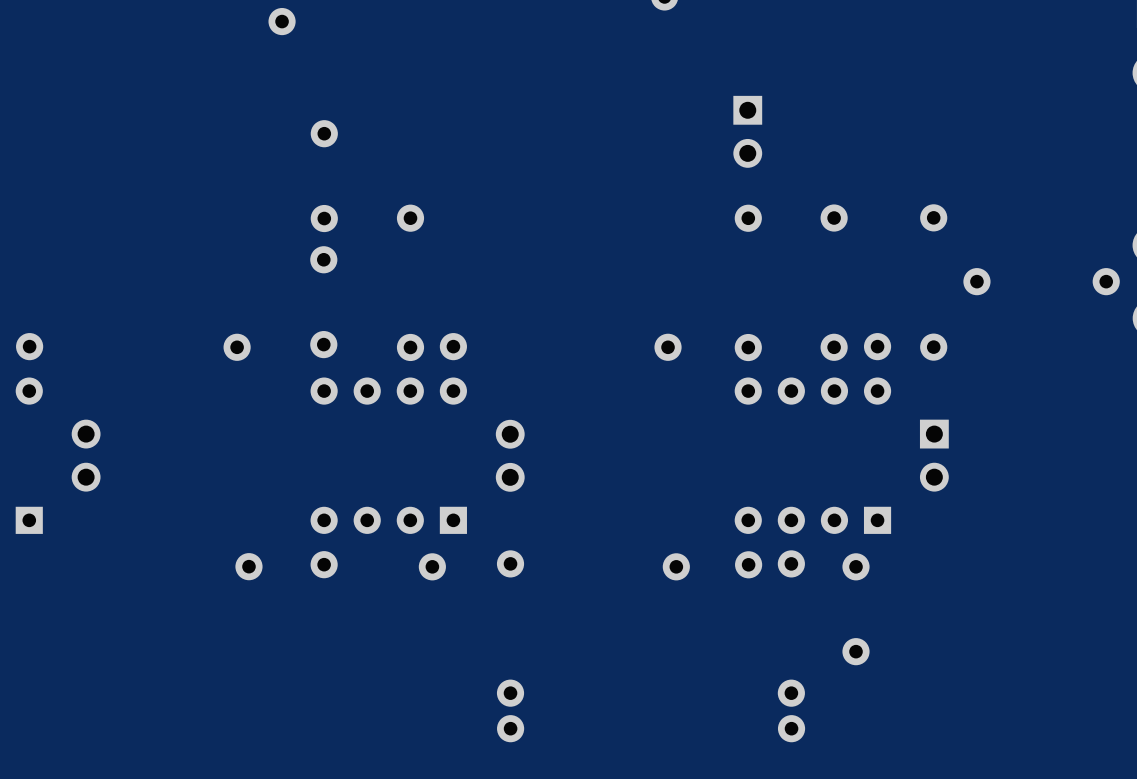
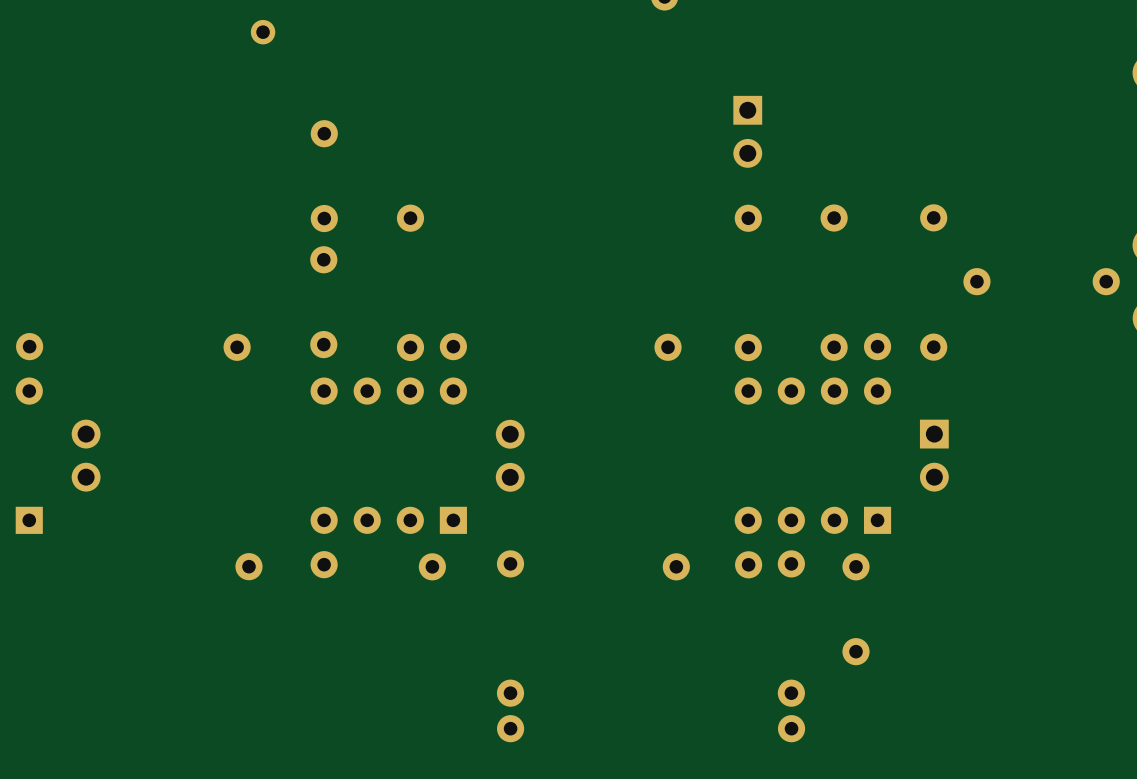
part: (282, 21) -> none
part: none -> (263, 32)

